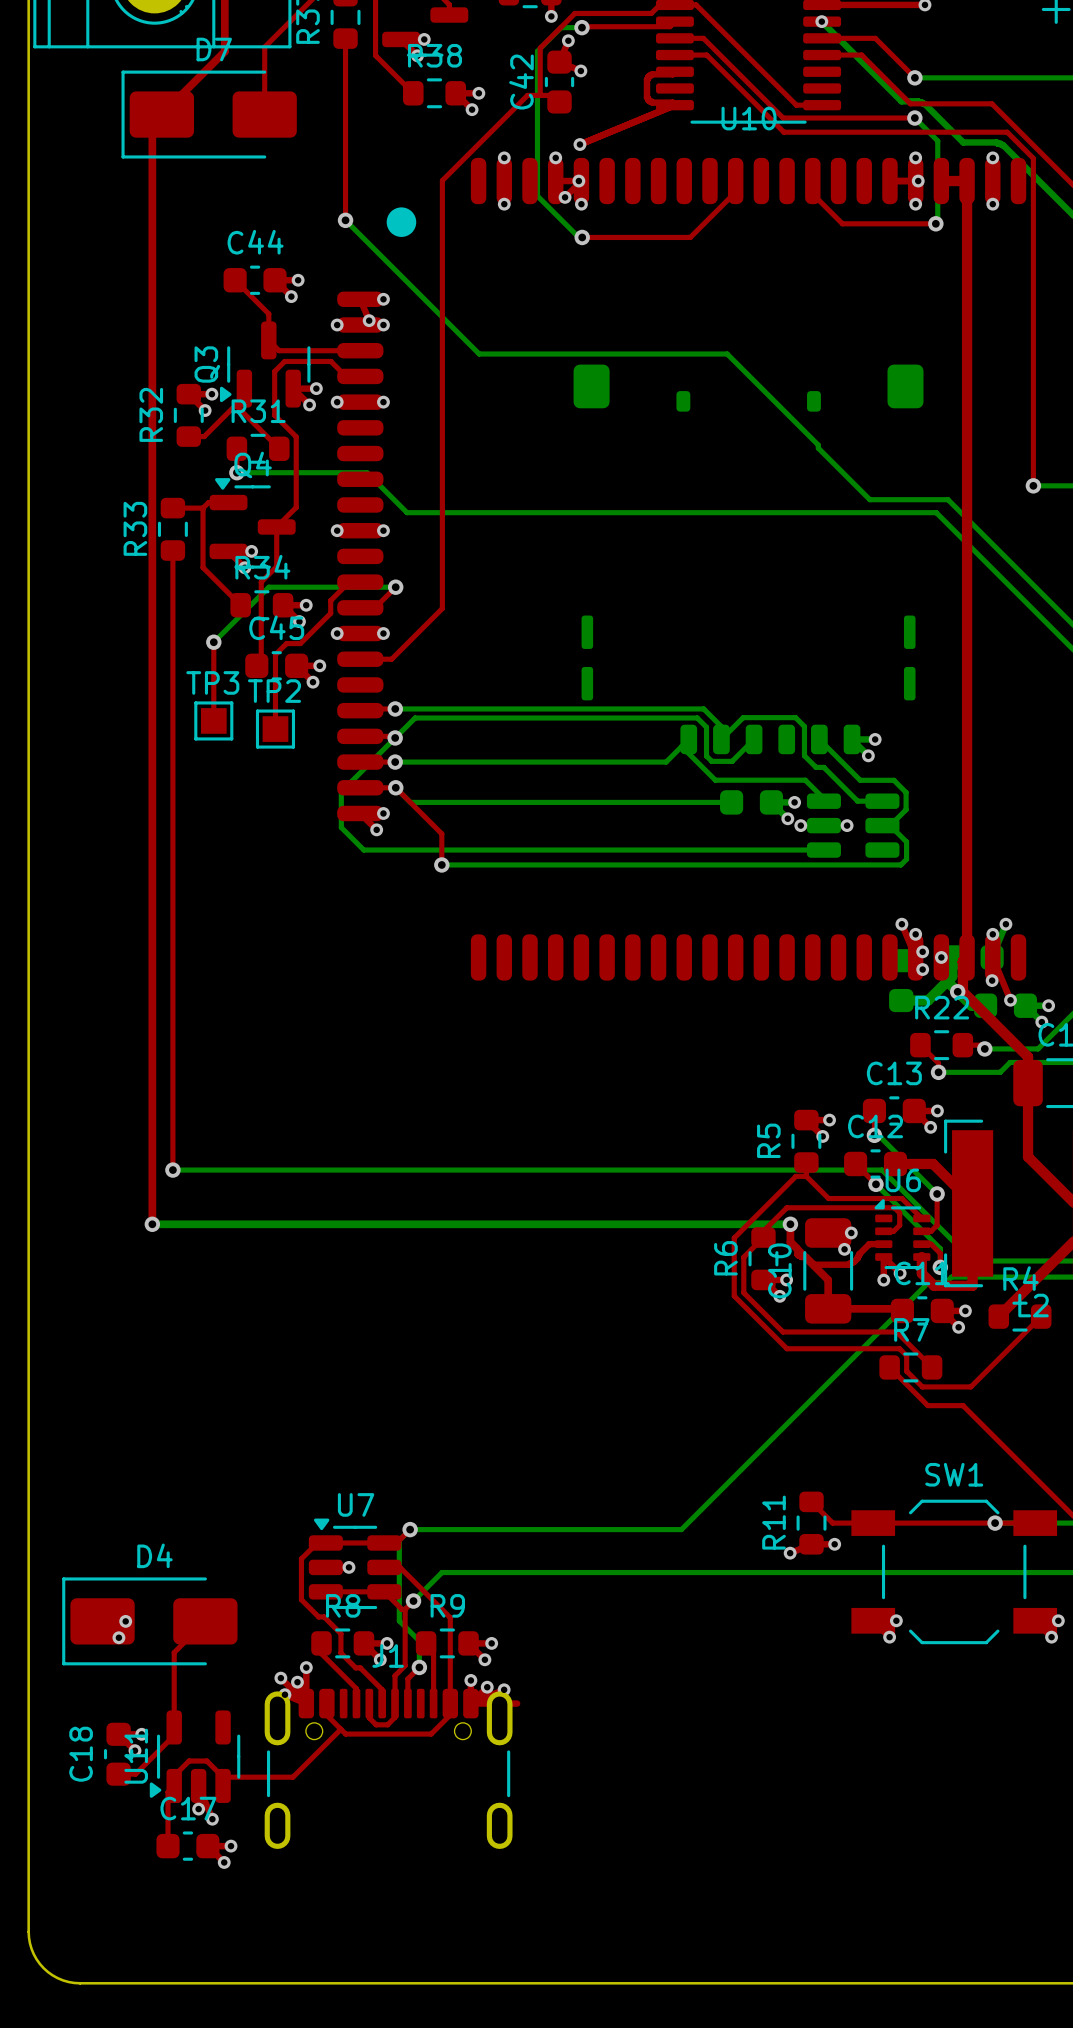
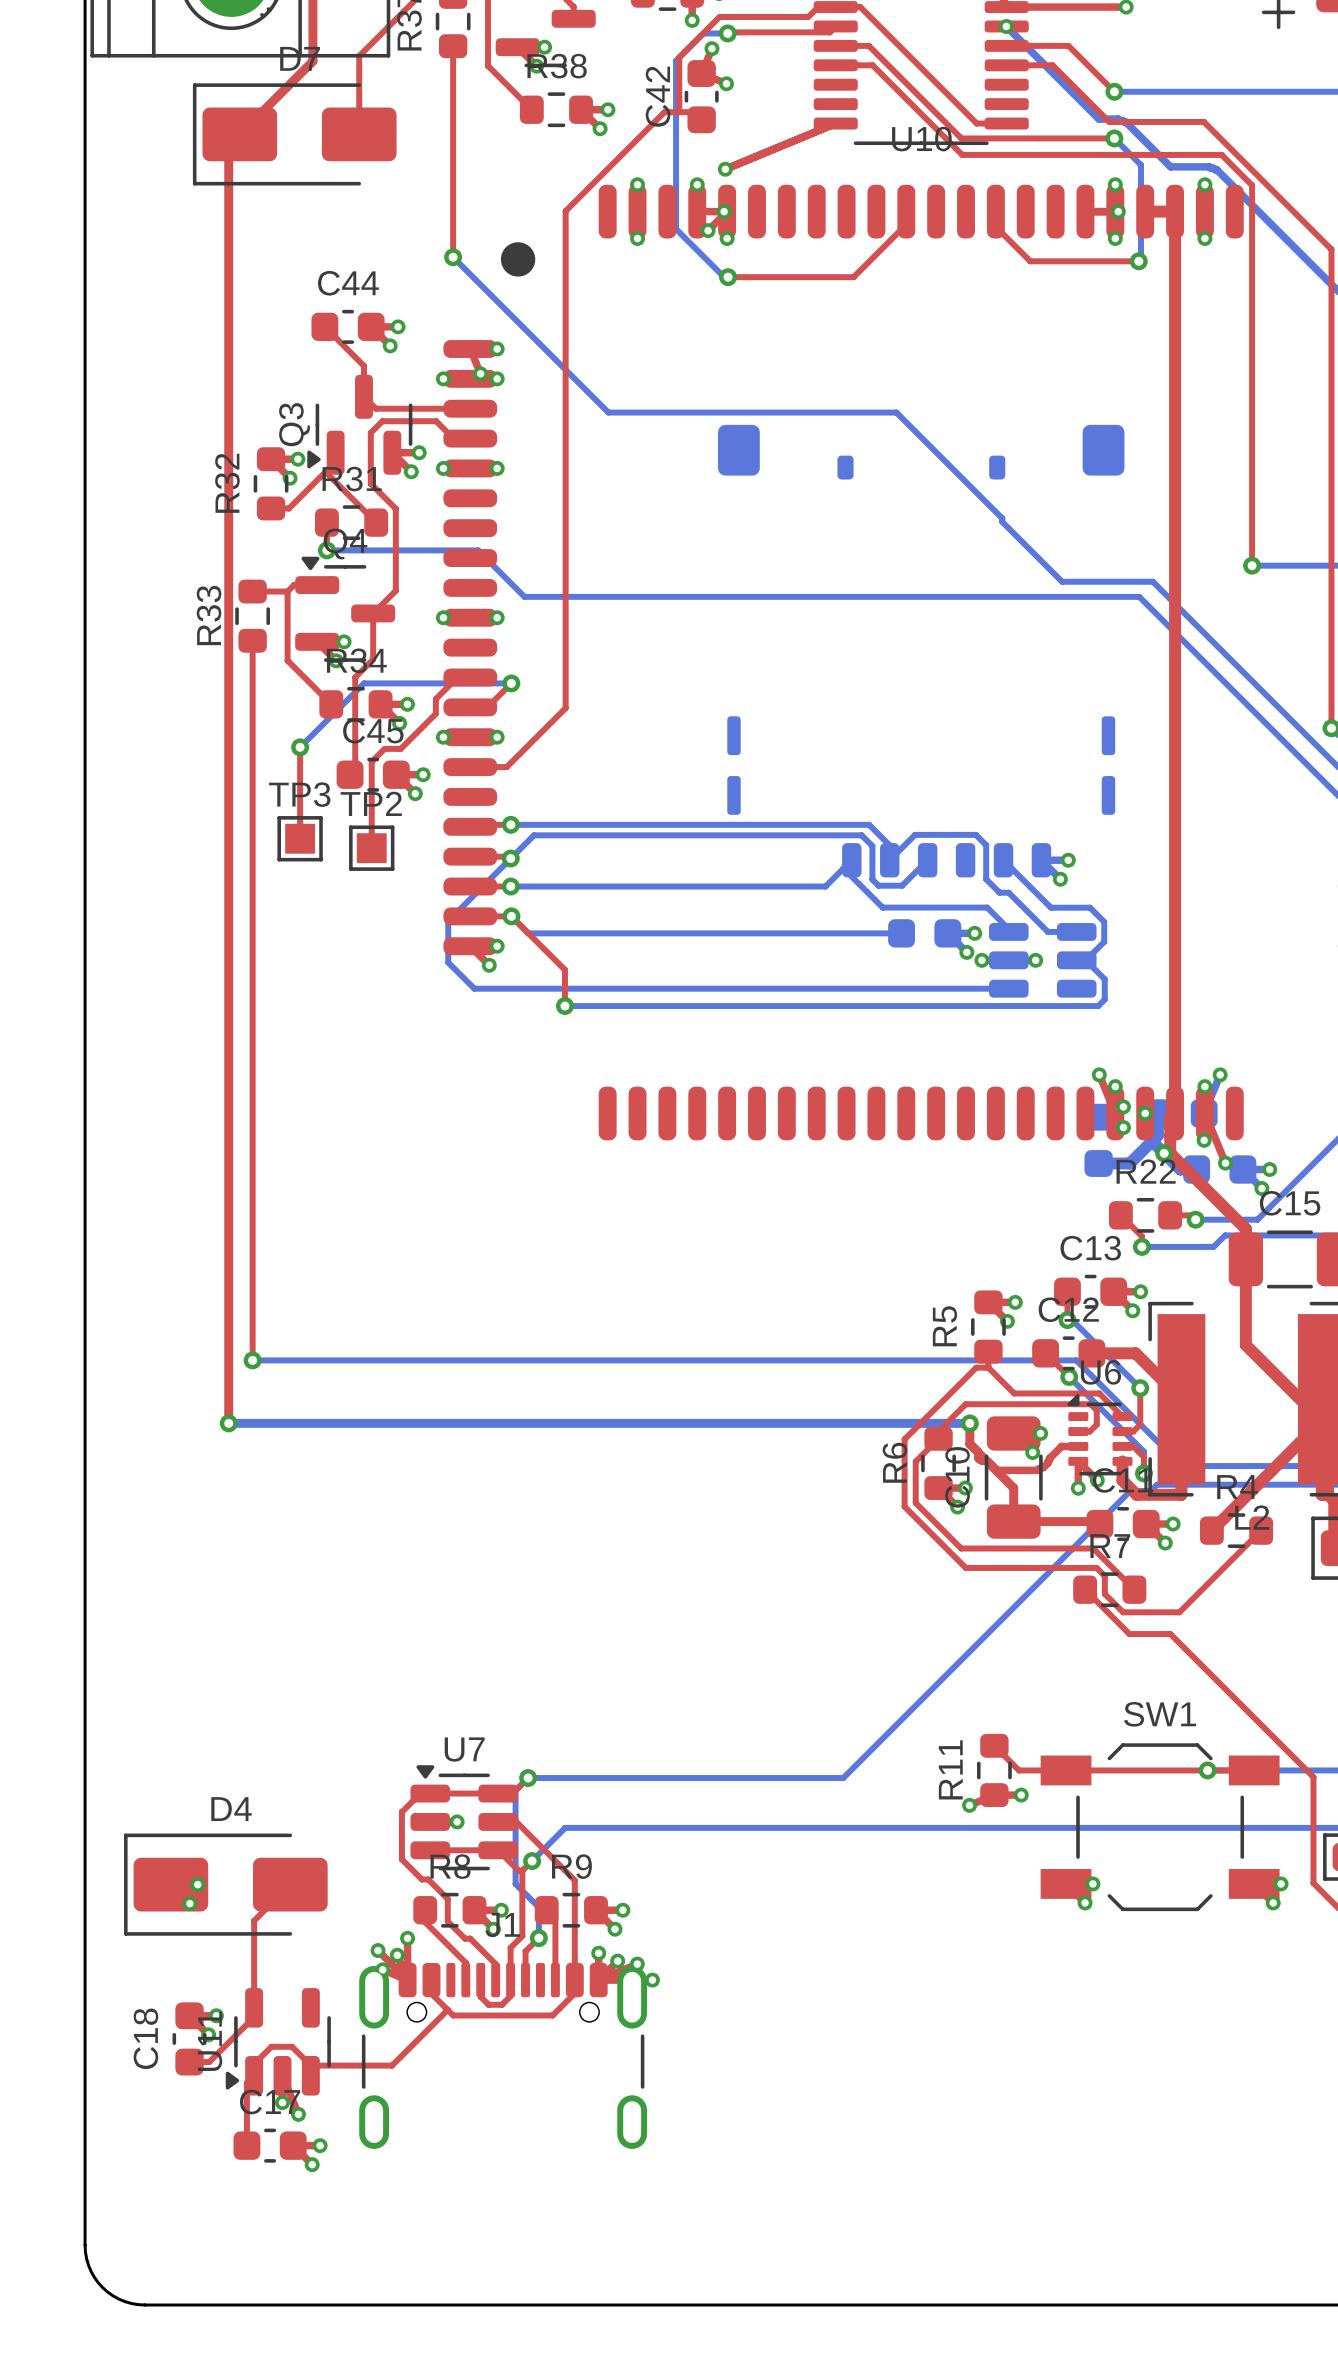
top track: (674, 71) (672, 74) (652, 74) (646, 79) (646, 97) (649, 101) (672, 102) (674, 105) -> none
via: none -> (652, 1980)

